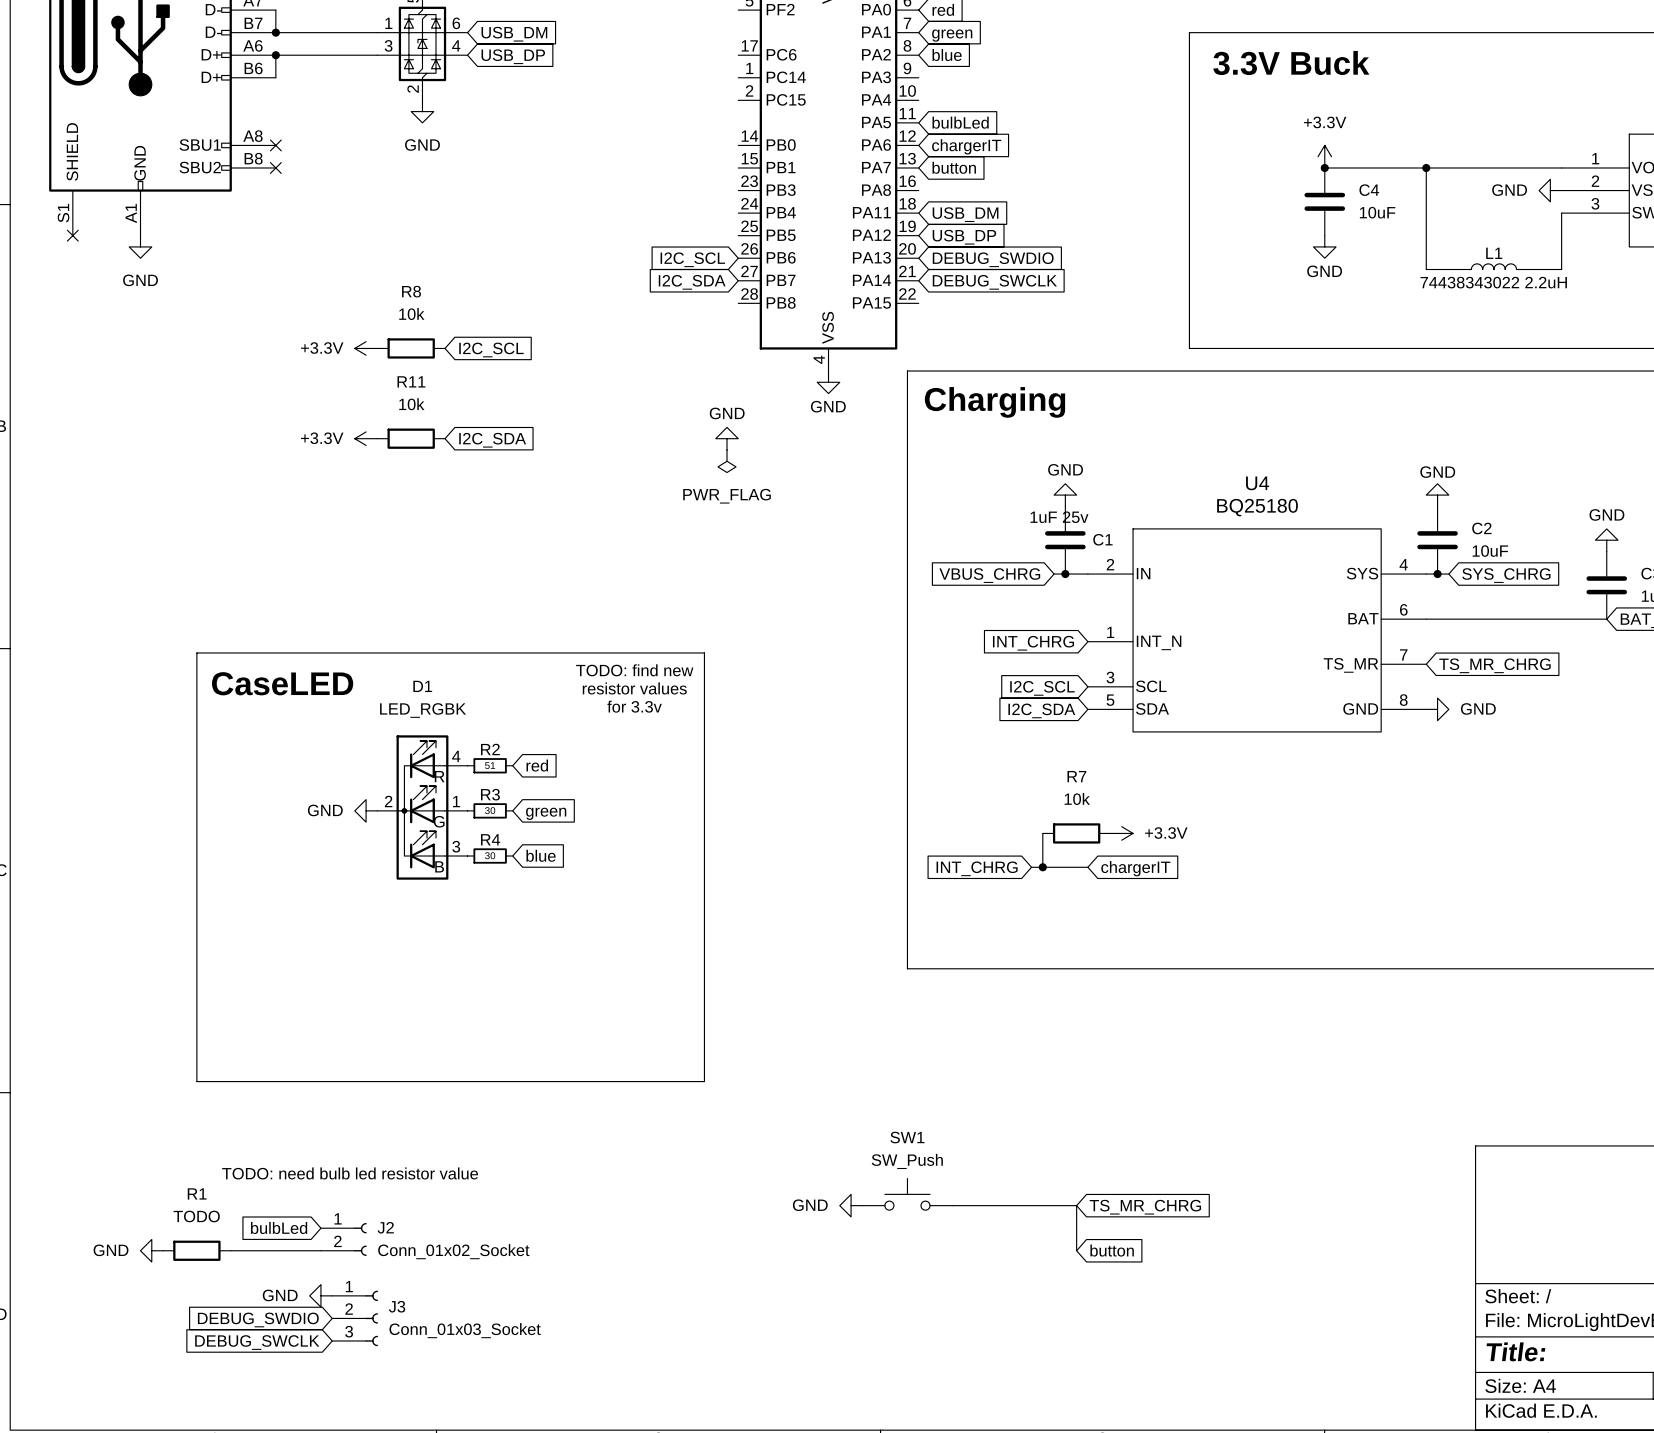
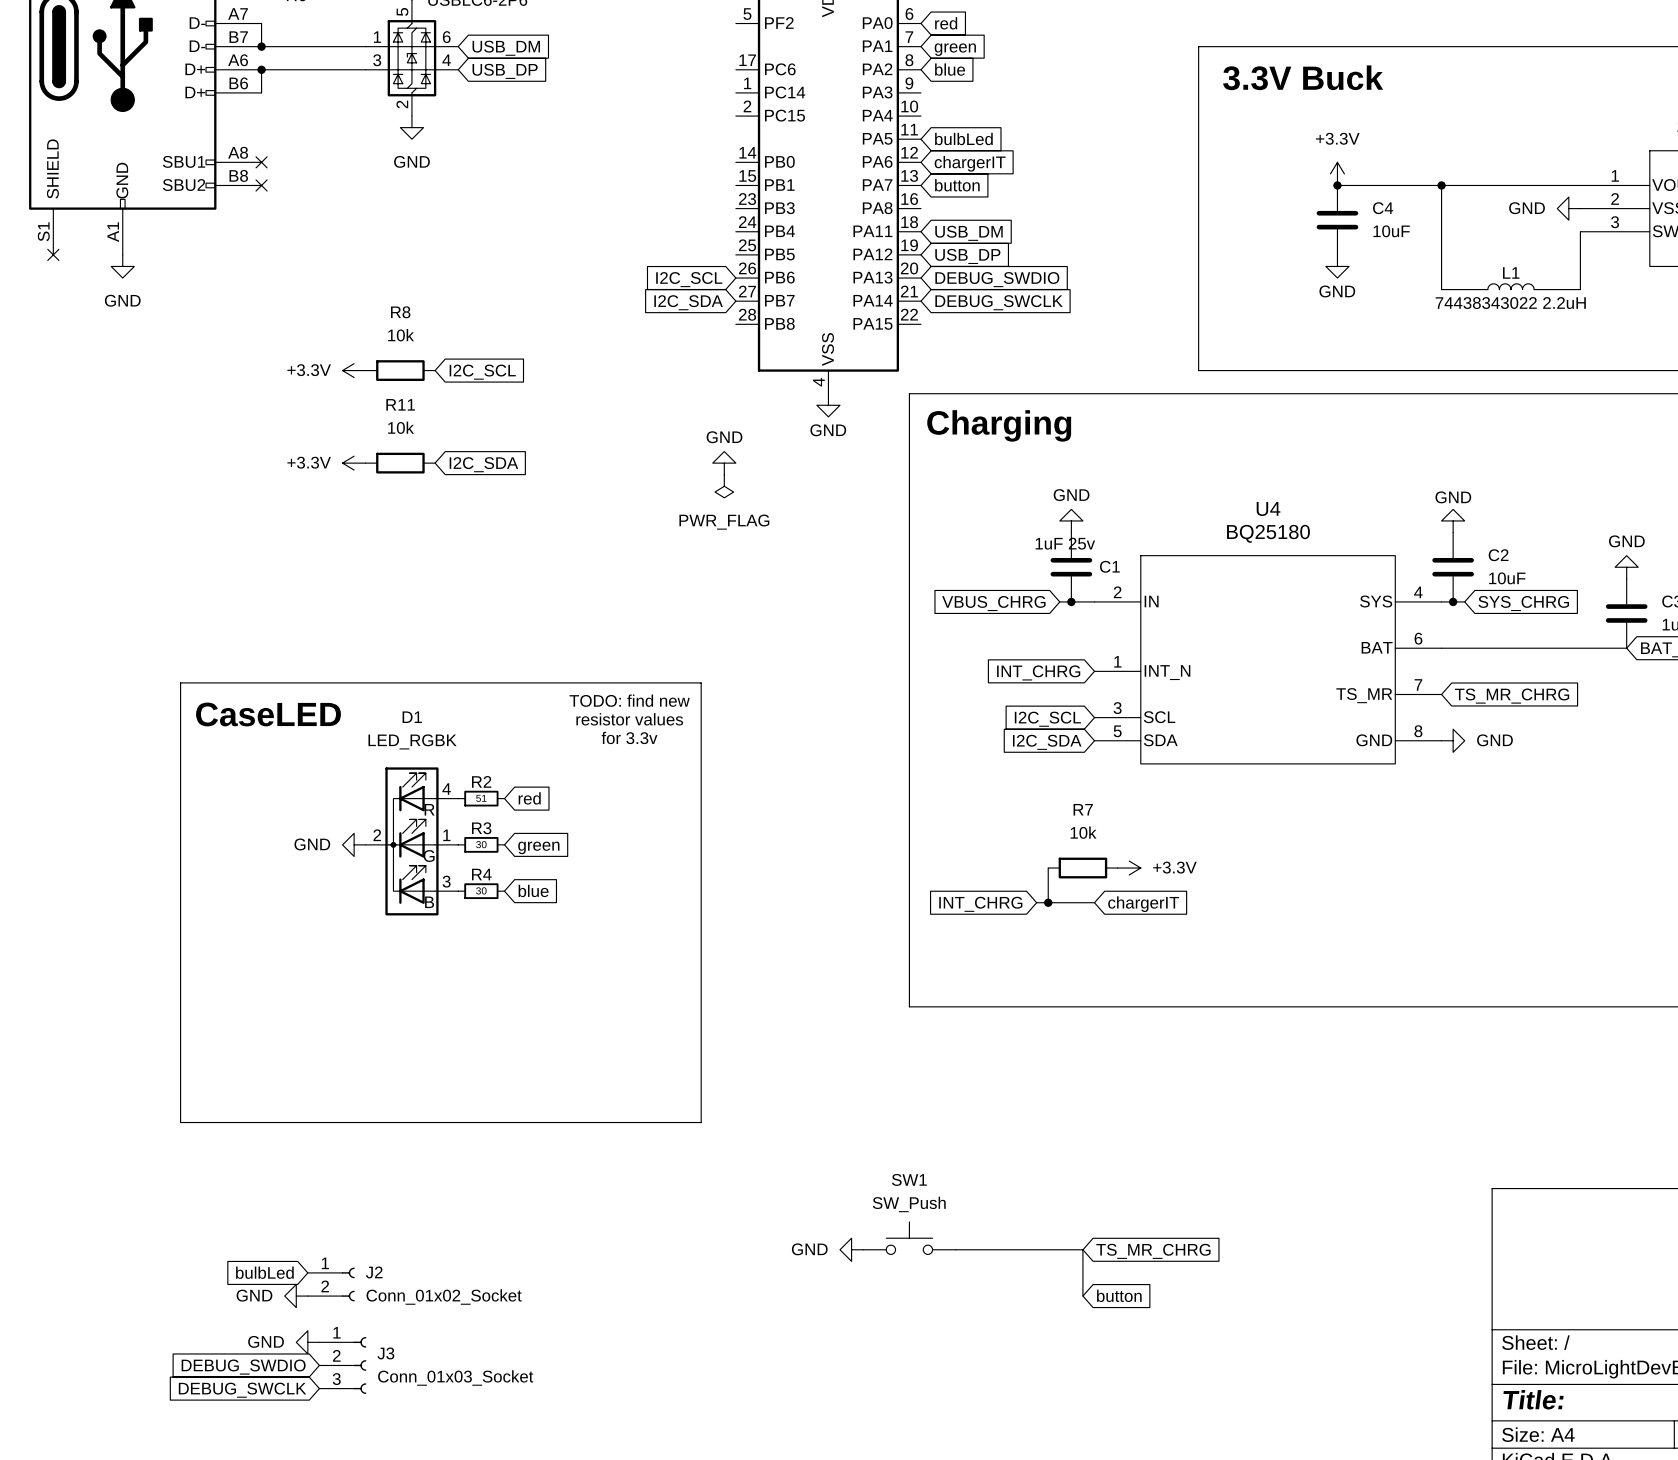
text: TODO: need bulb led resistor value (350, 1173) -> none
power symbol position: GND (151, 1250) -> GND (296, 1296)
R1: TODO (196, 1250) -> none
wire: (230, 1250) (320, 1250) -> none

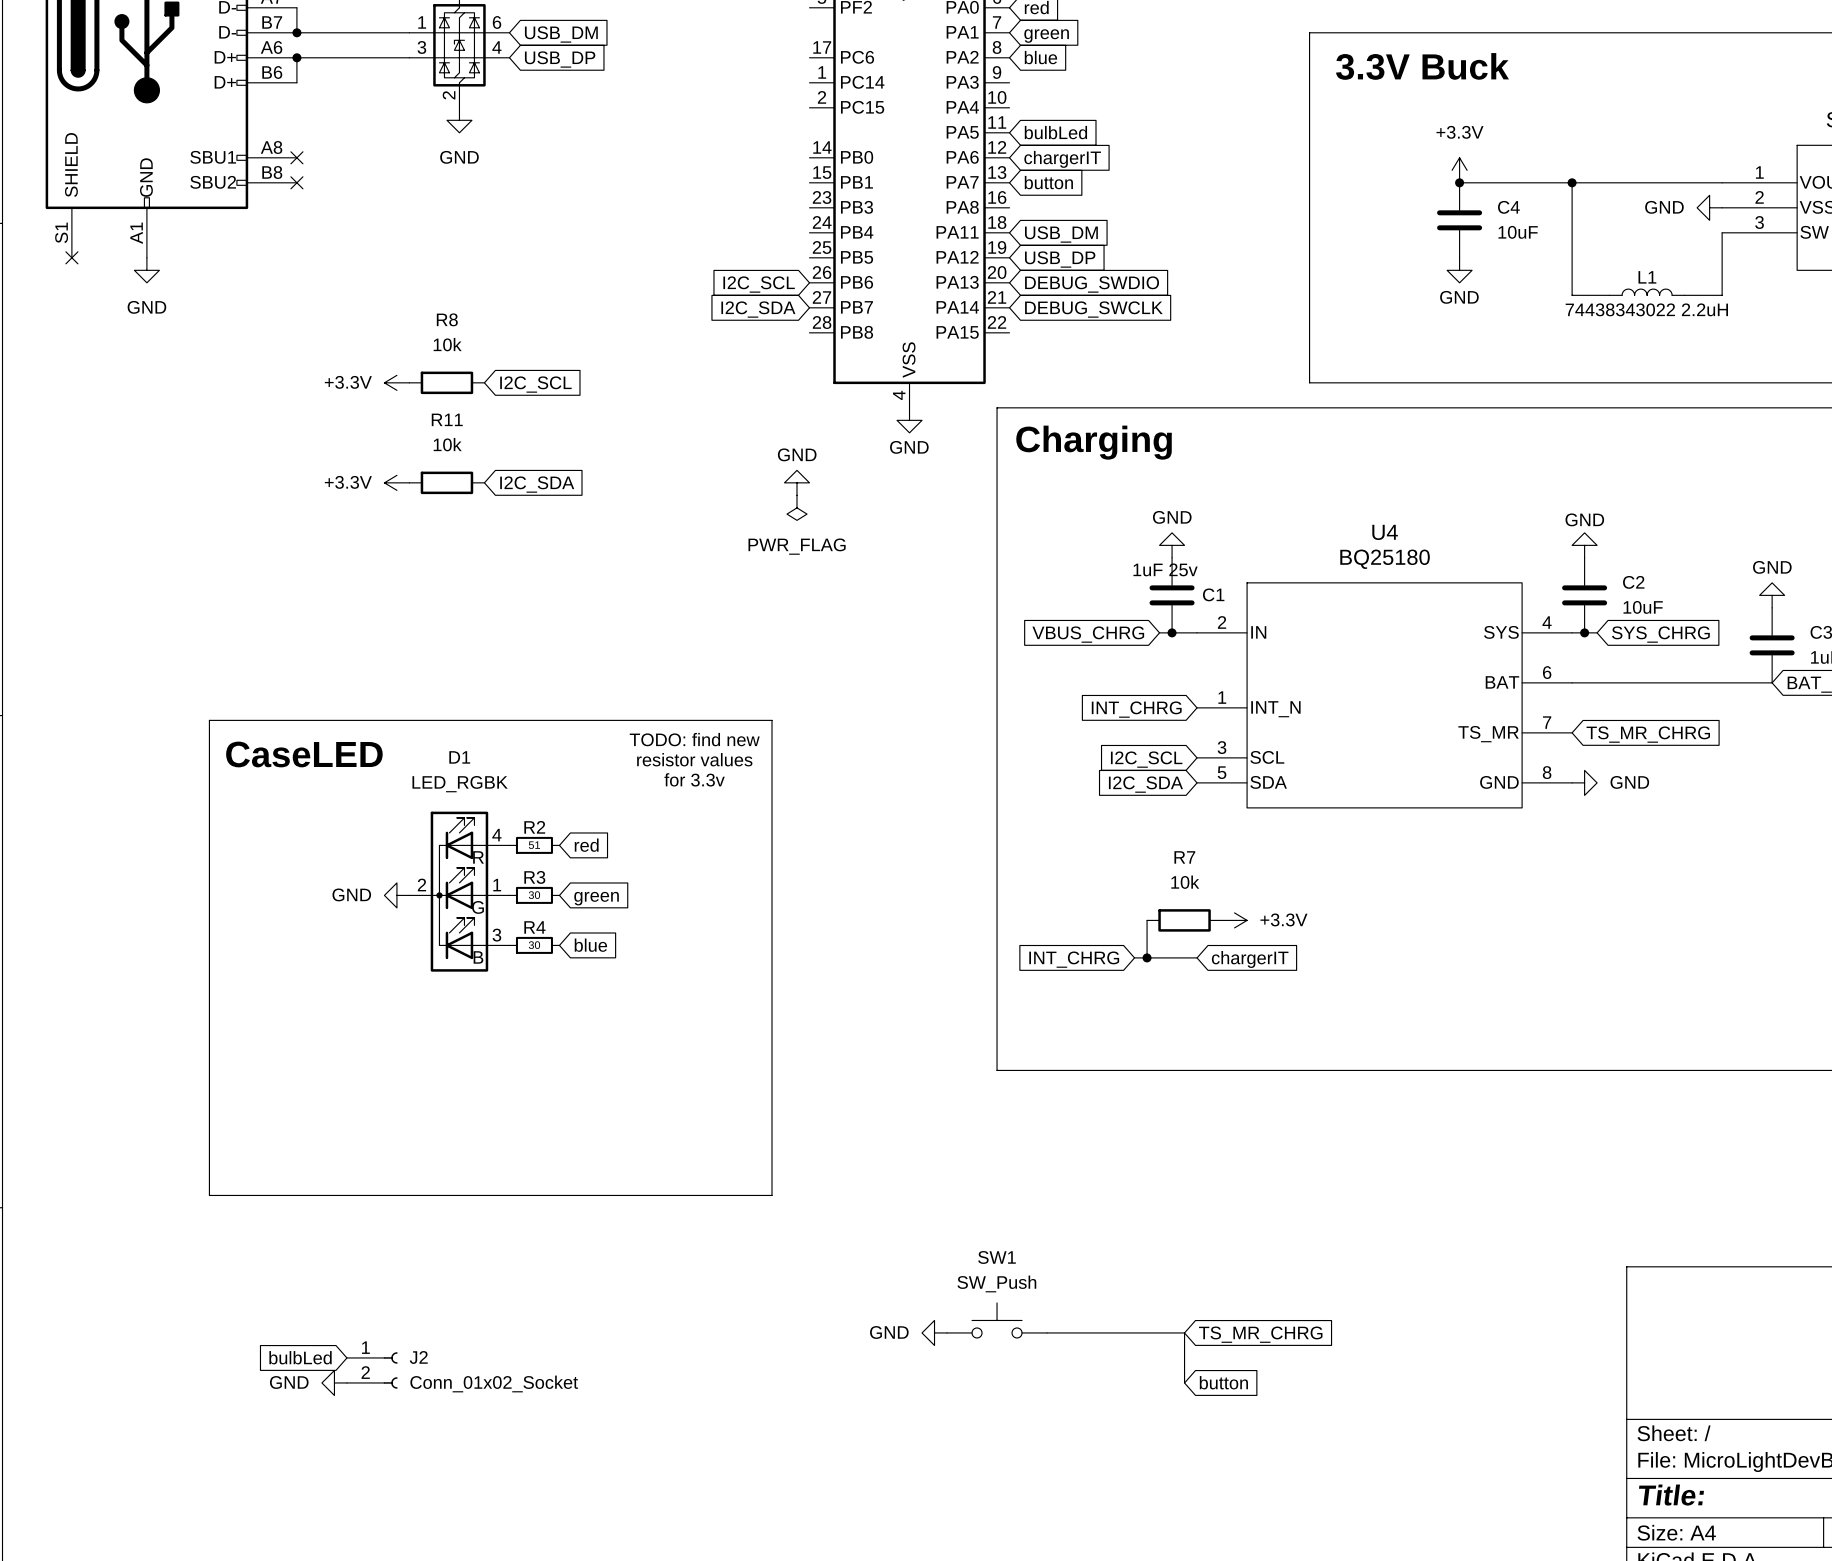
power symbol: GND (307, 1342) -> none
J3: Conn_01x03_Socket (342, 1365) -> none
global label: DEBUG_SWDIO (243, 1367) -> none
global label: DEBUG_SWCLK (242, 1390) -> none

